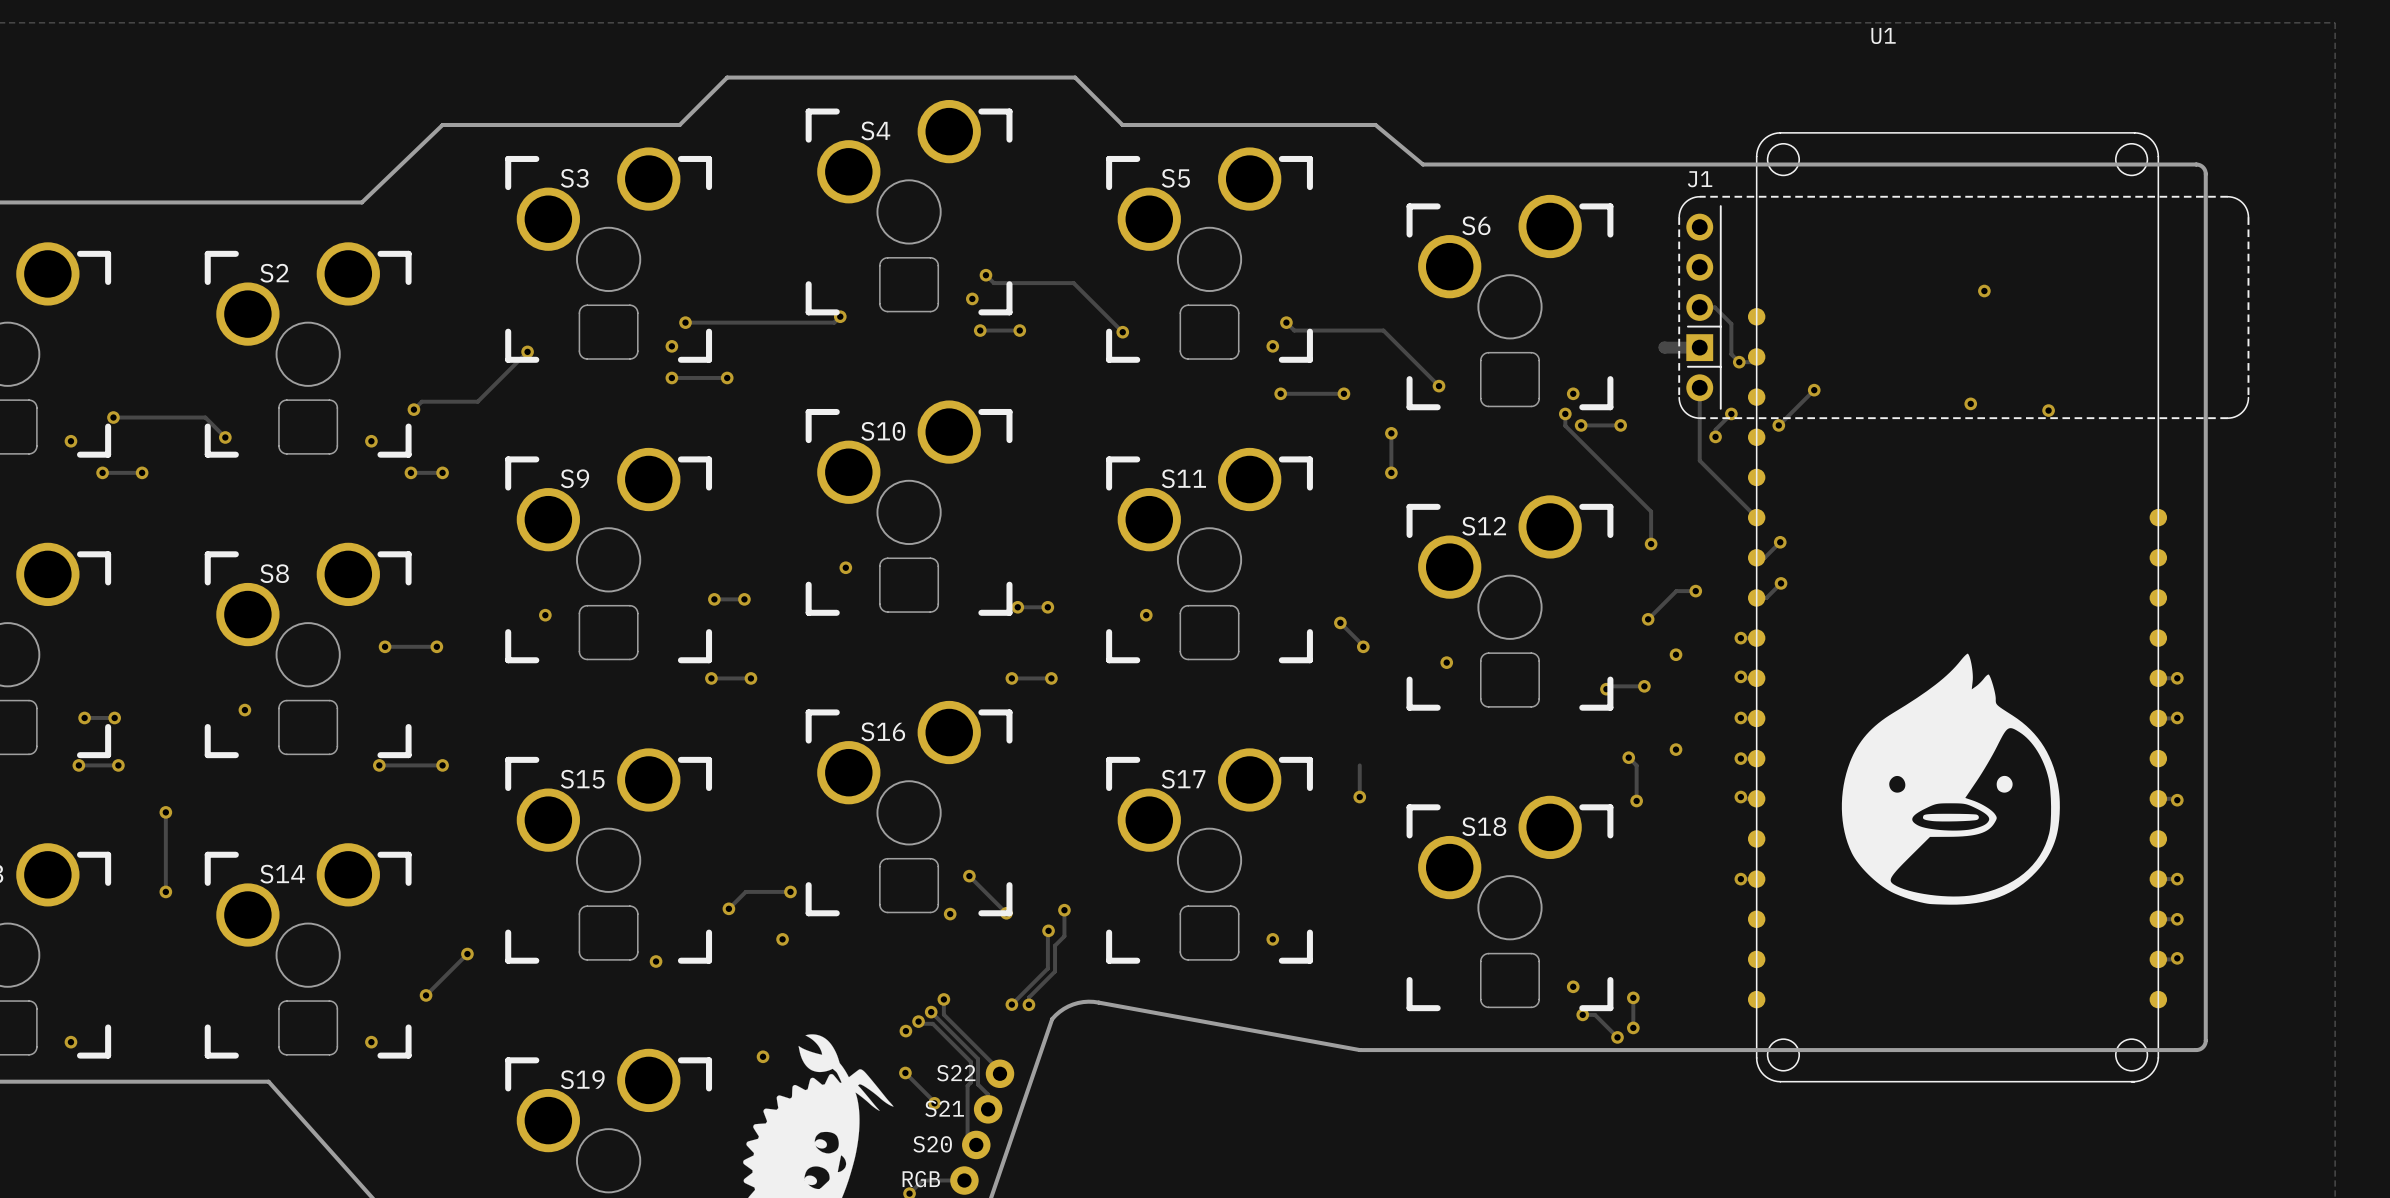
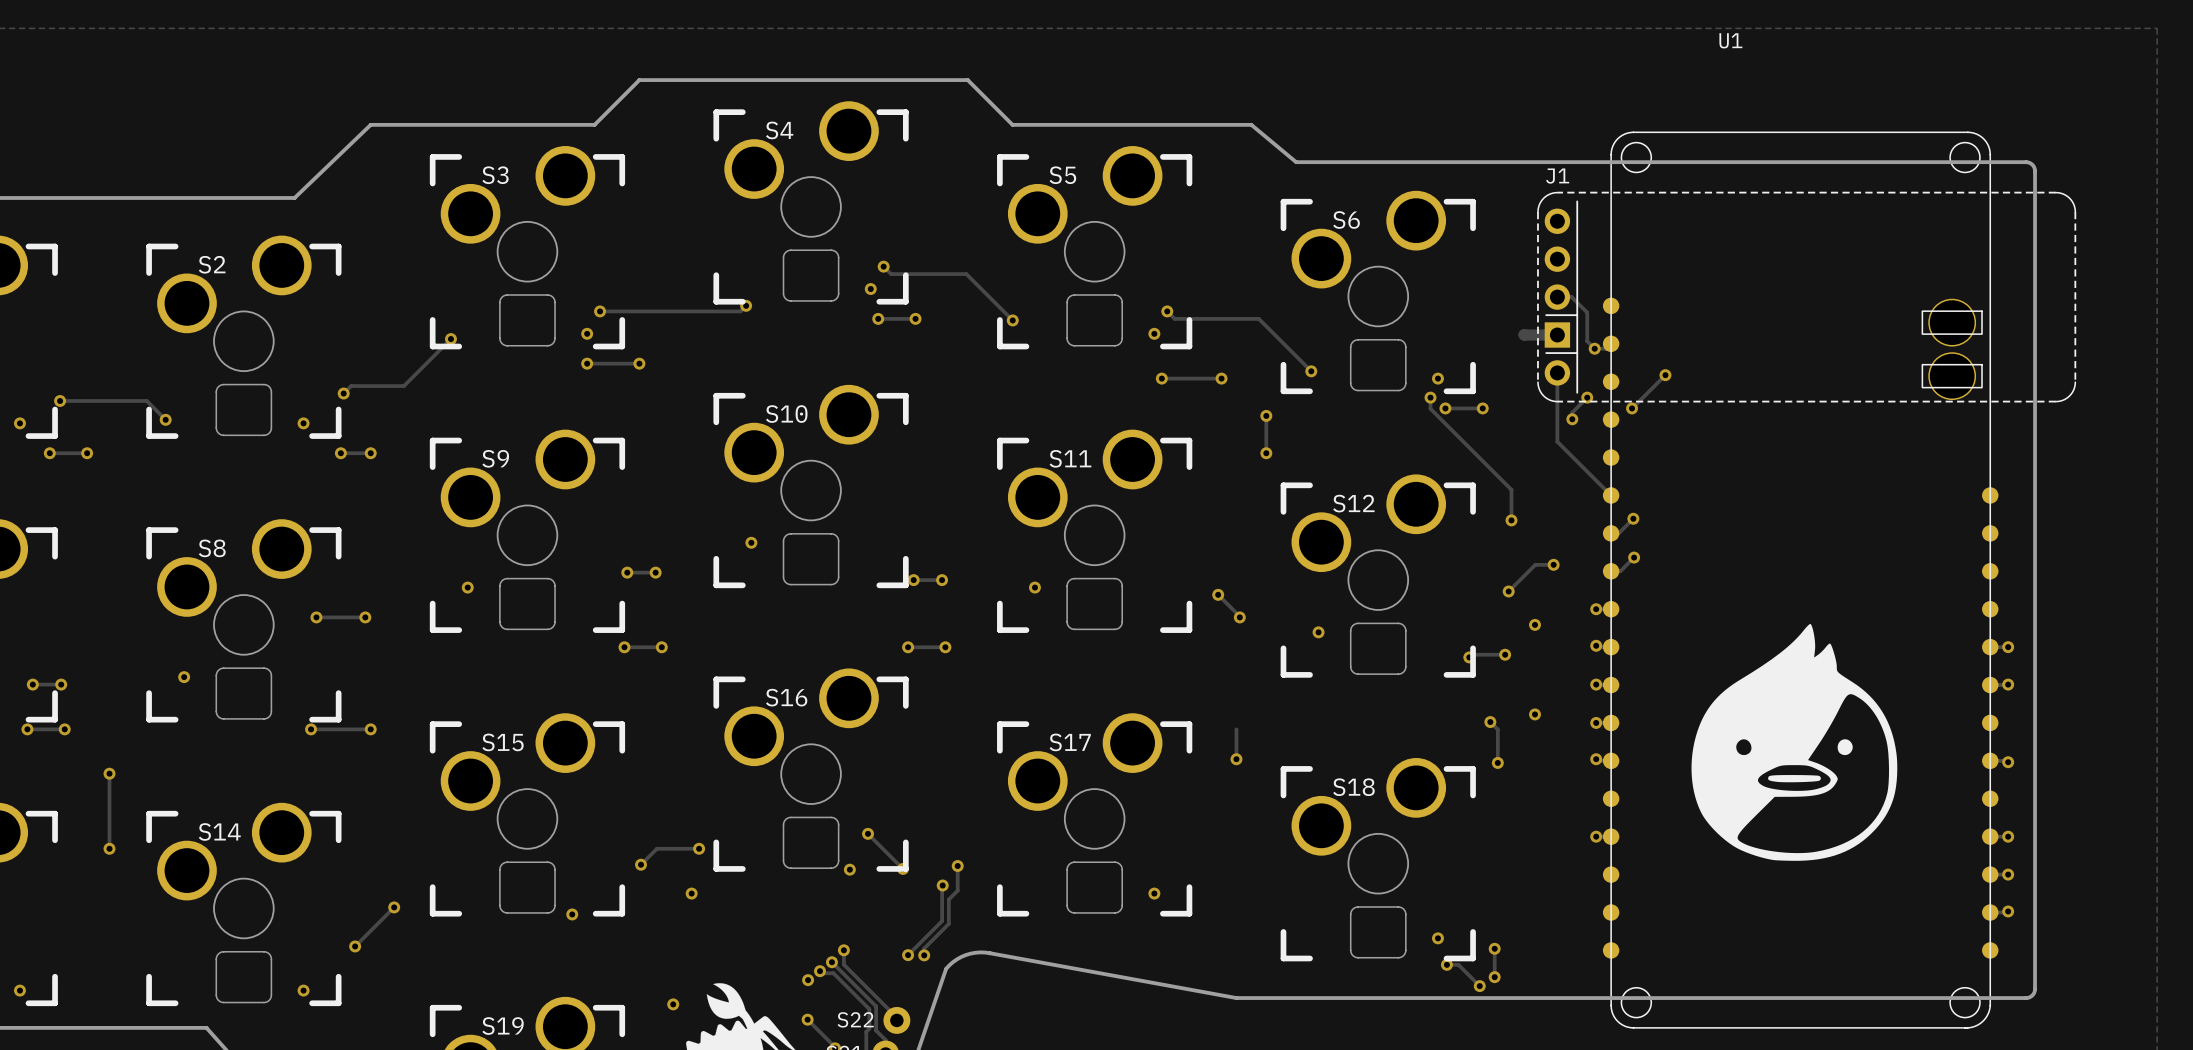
U1 footprint: [1747, 132, 2168, 1083] -> [1602, 131, 1999, 1029]
via: (1984, 291) -> none
via: (1970, 403) -> none
via: (2048, 410) -> none

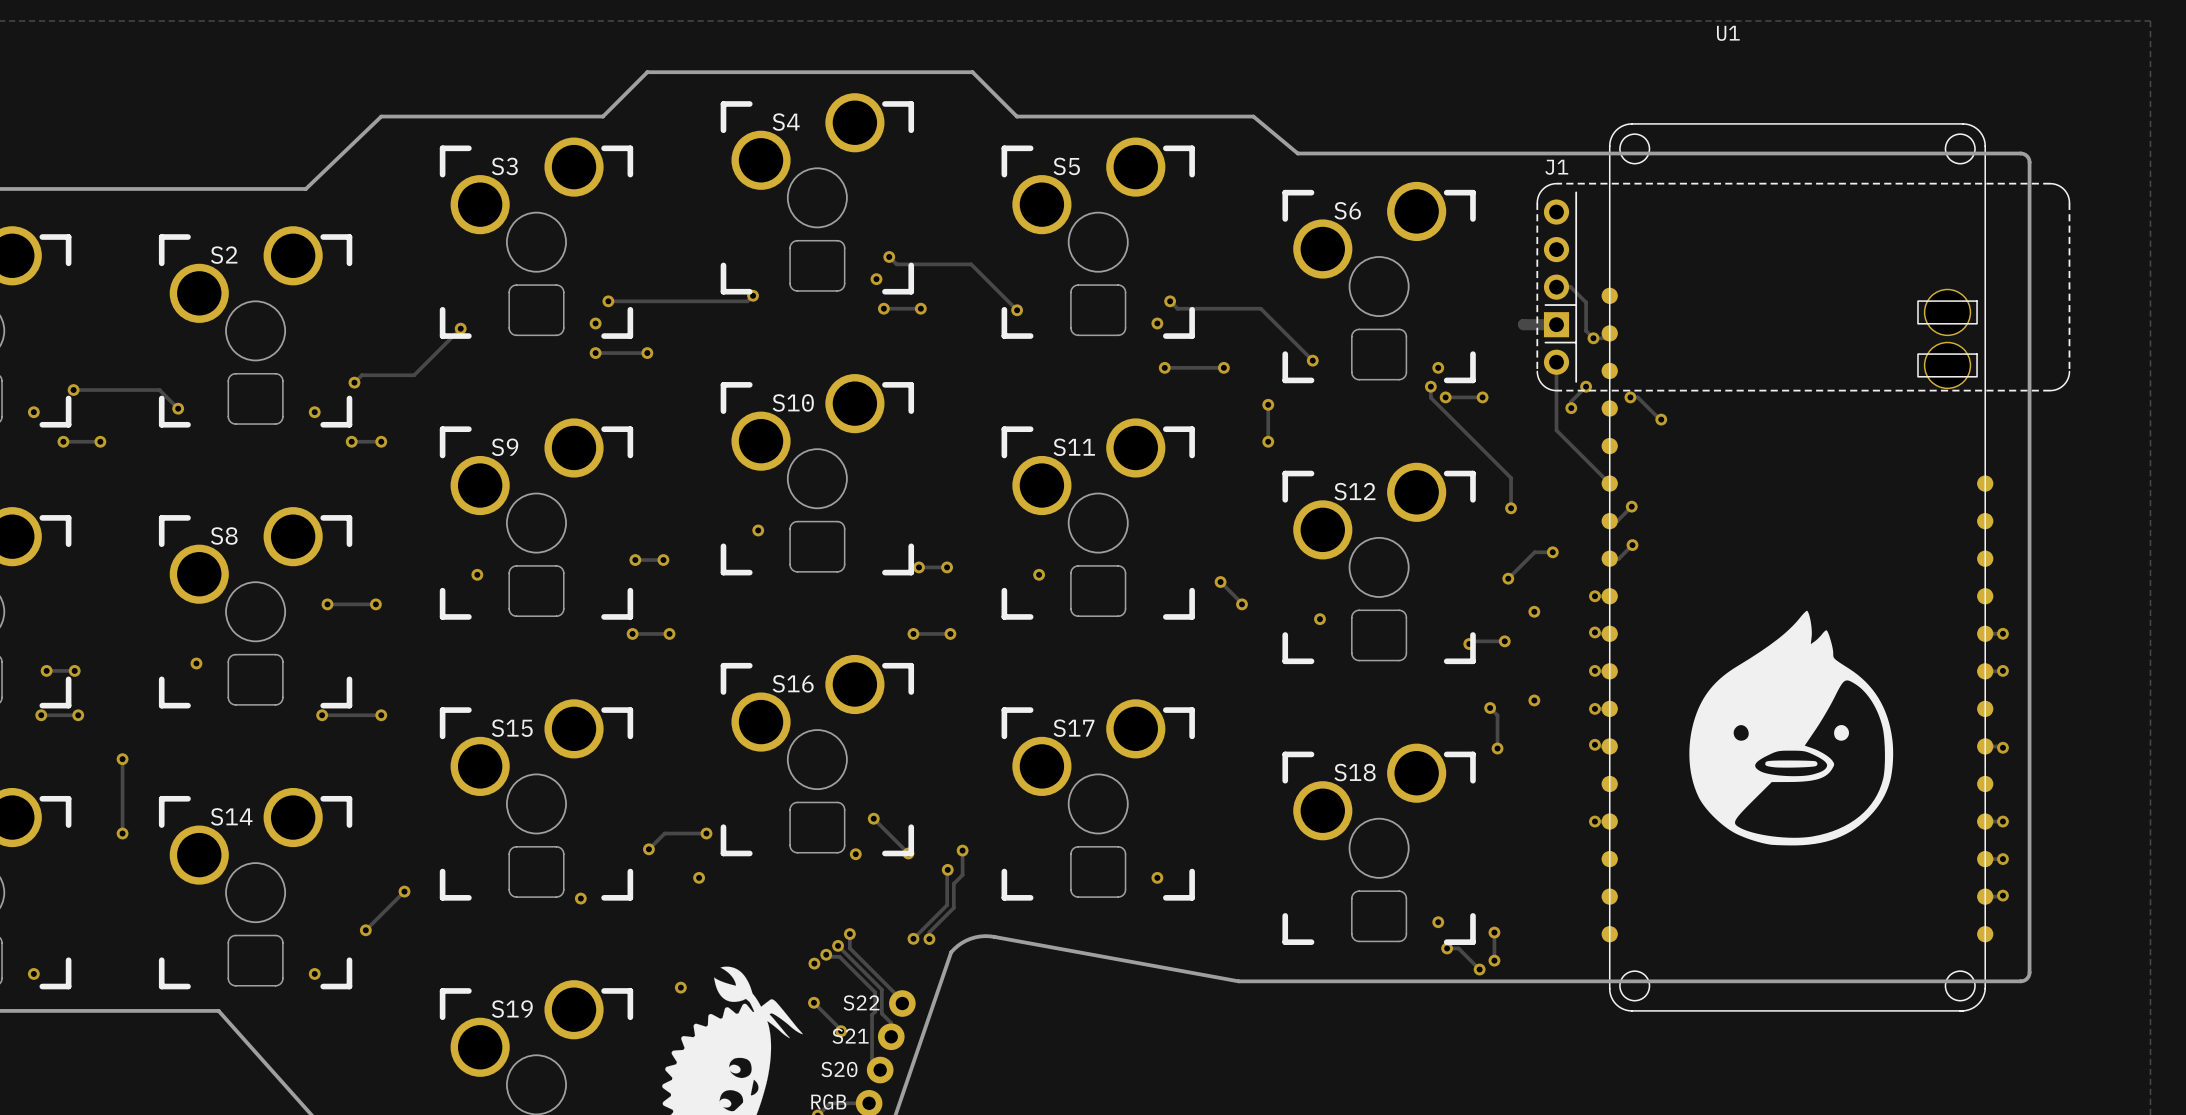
track: (1665, 375) (1632, 408) -> (1661, 419) (1637, 397) (1630, 397)
via position: (1665, 375) -> (1661, 419)
track: (1236, 729) (1236, 759) -> none
via: (1236, 759) -> none

